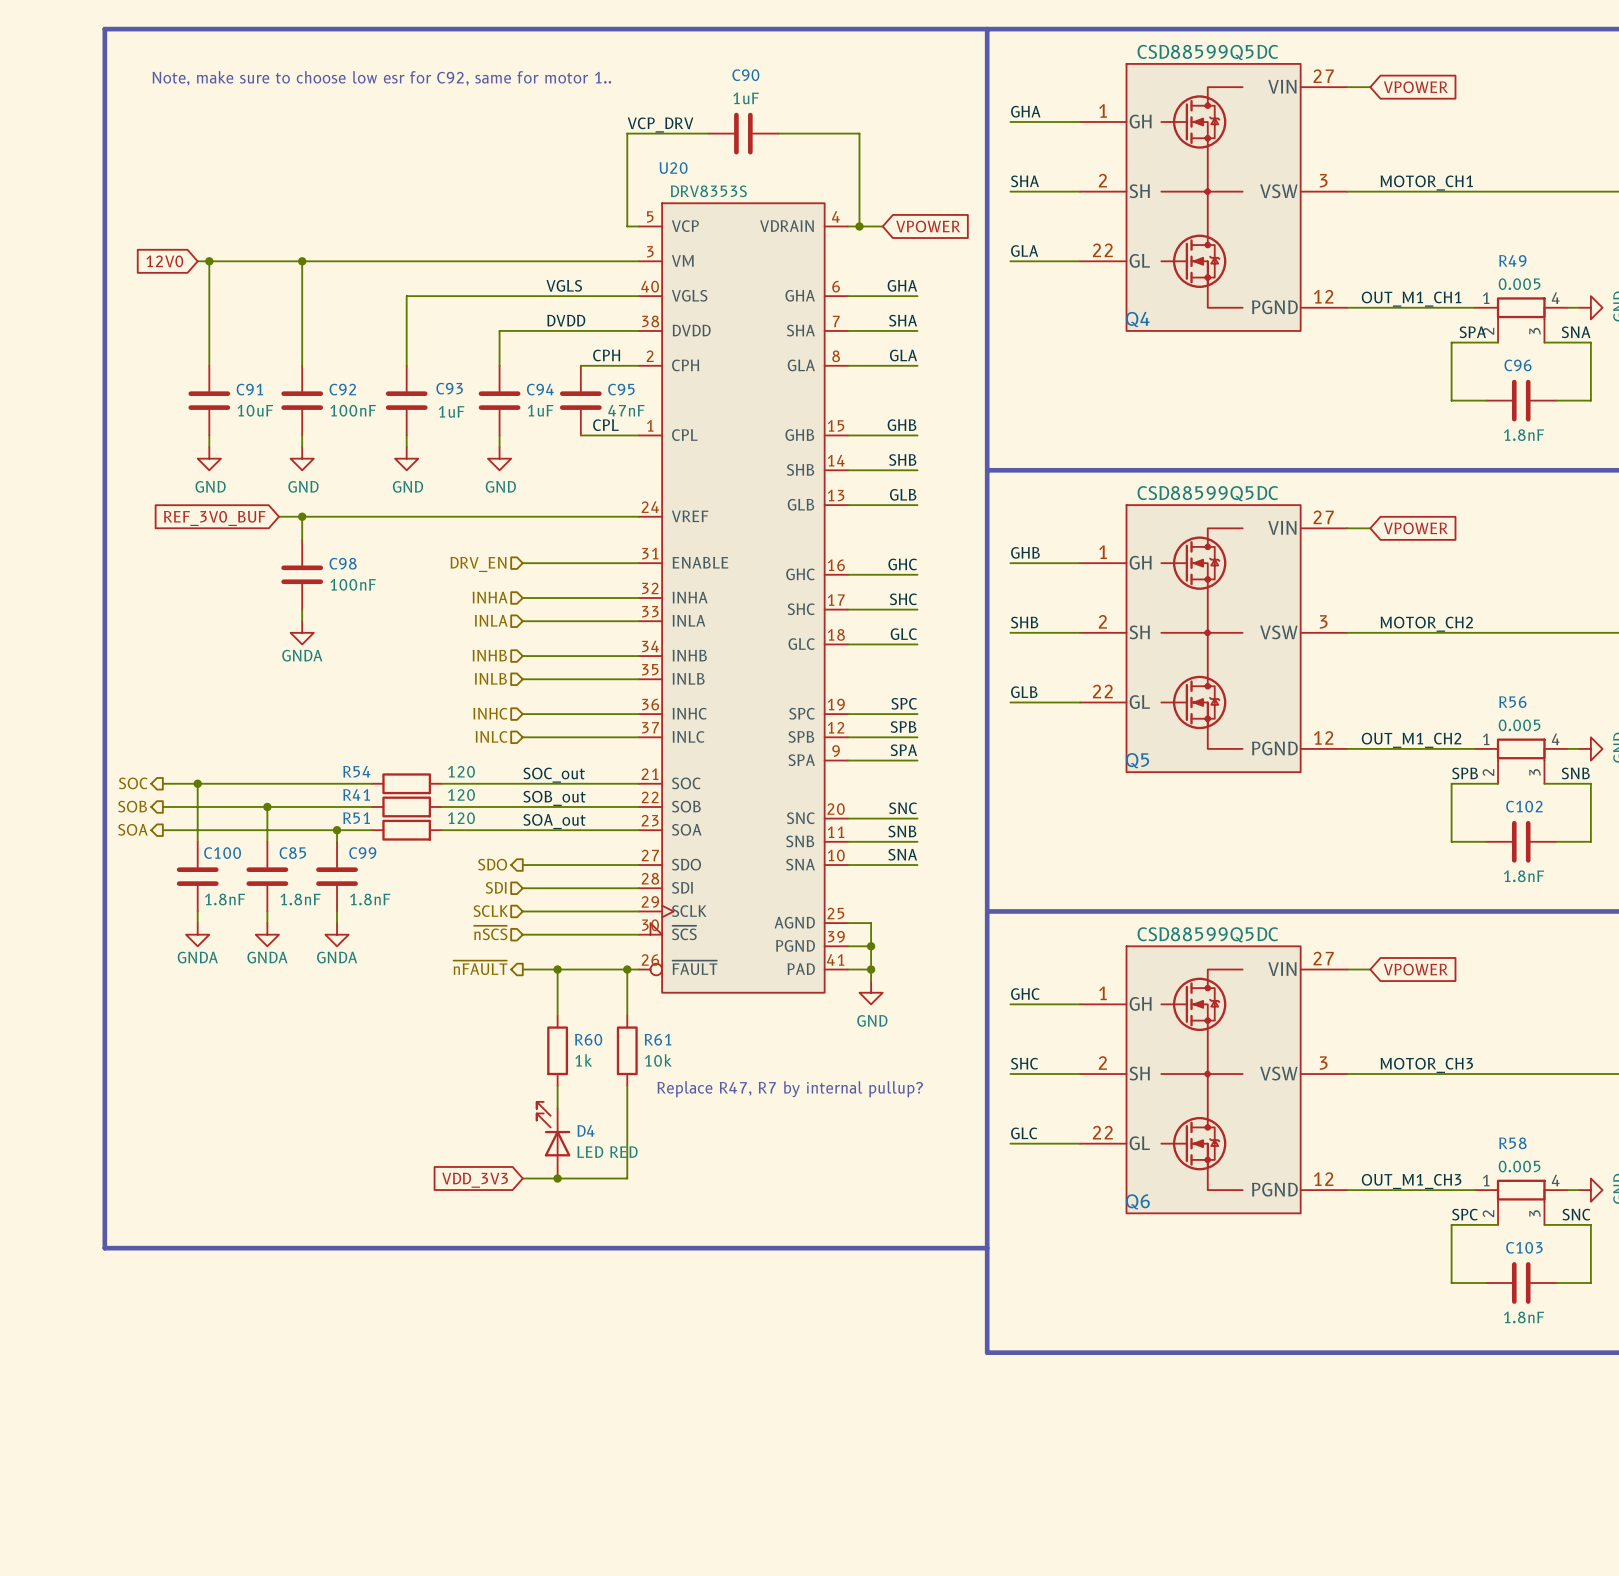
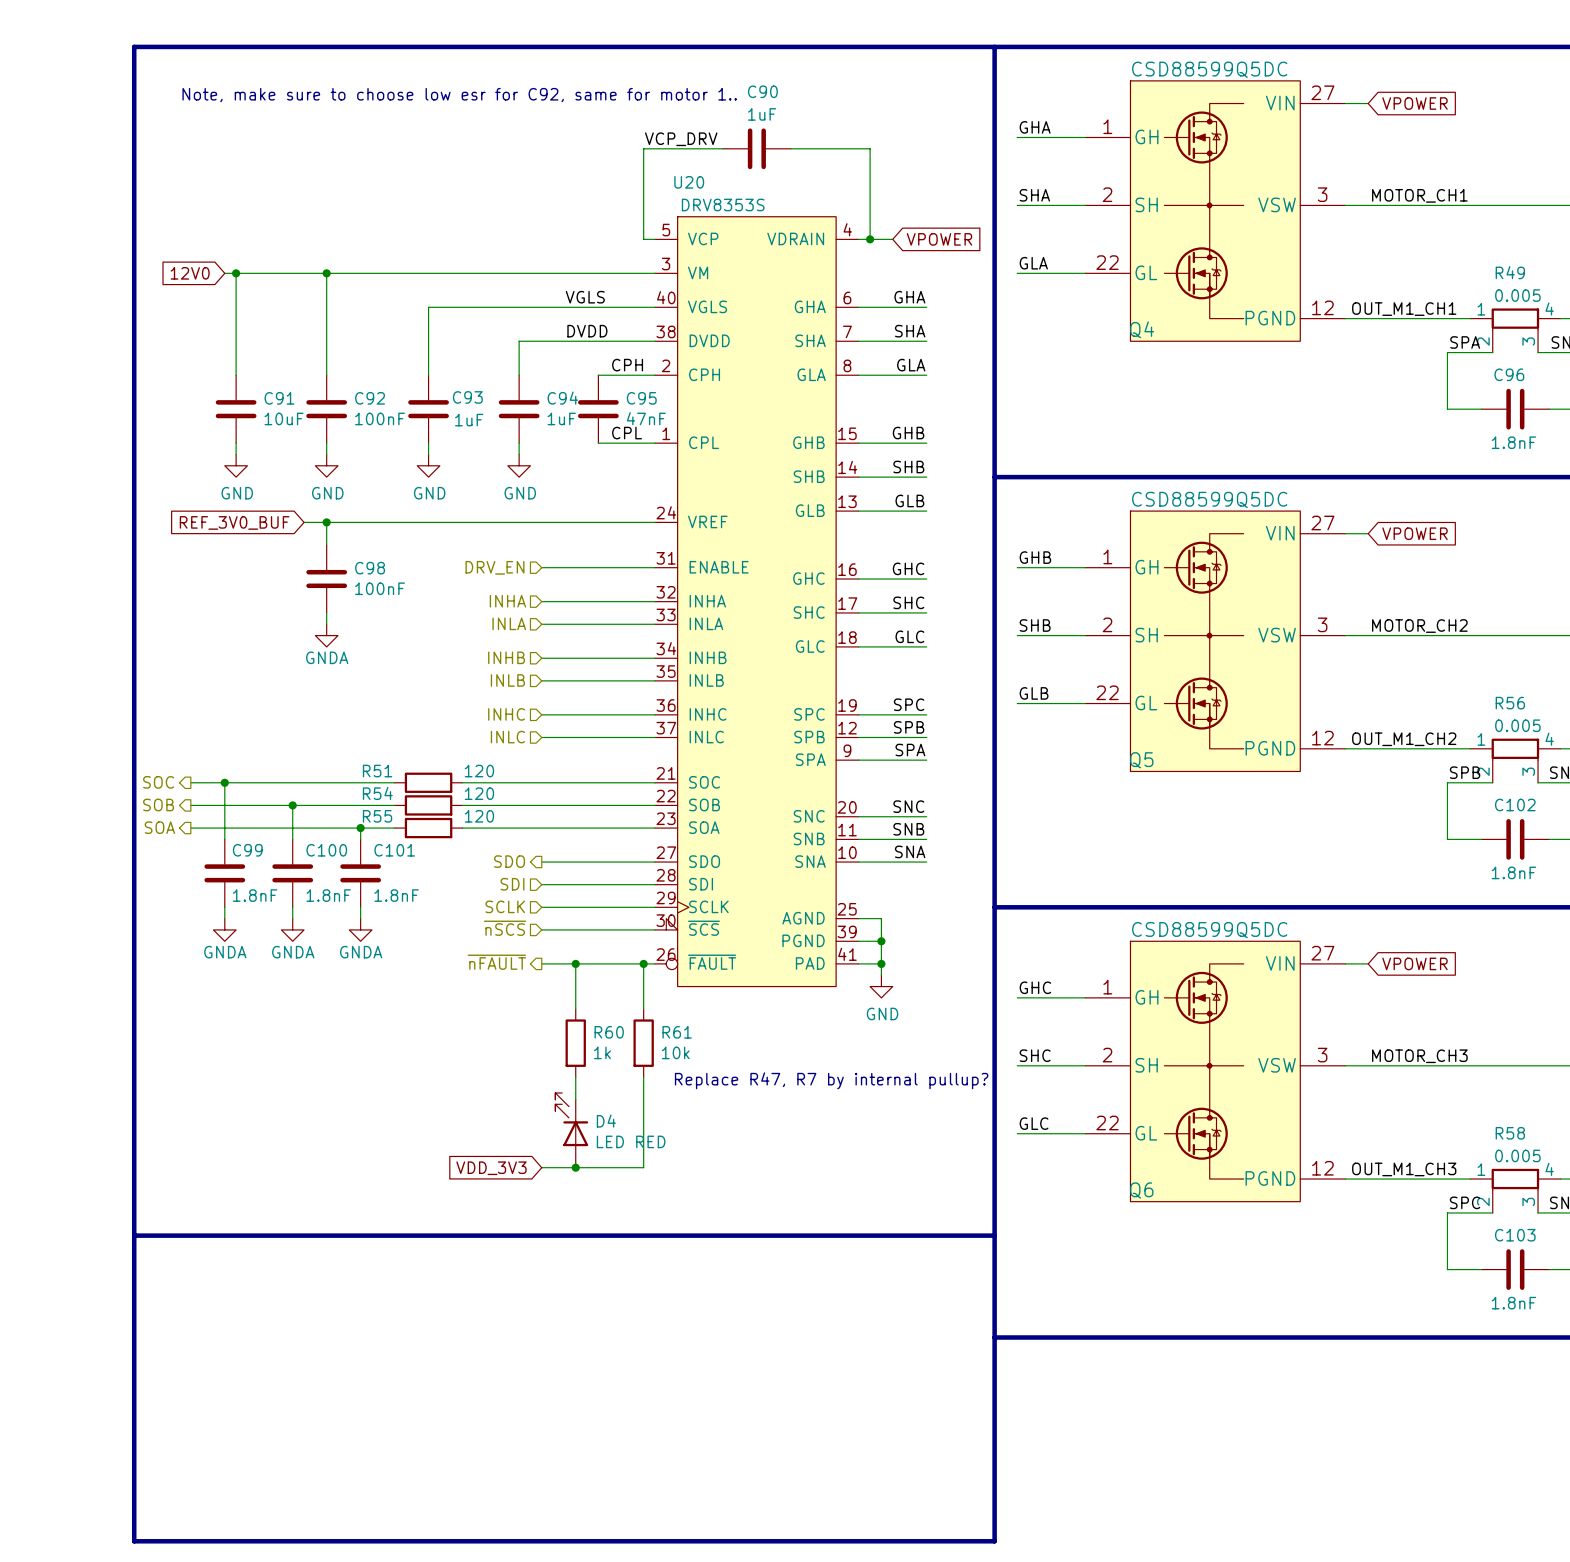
R54 name: R54 (356, 771) -> R51 (377, 771)
label: SOC_out (554, 775) -> none
R41 name: R41 (356, 794) -> R54 (377, 793)
label: SOB_out (554, 798) -> none
R51 name: R51 (356, 818) -> R55 (377, 816)
label: SOA_out (554, 821) -> none
C100 name: C100 (222, 853) -> C99 (247, 850)
C85 name: C85 (292, 853) -> C100 (326, 850)
C99 name: C99 (362, 853) -> C101 (394, 850)
line: none -> (134, 1235) (134, 1541) (994, 1541) (994, 1337)

